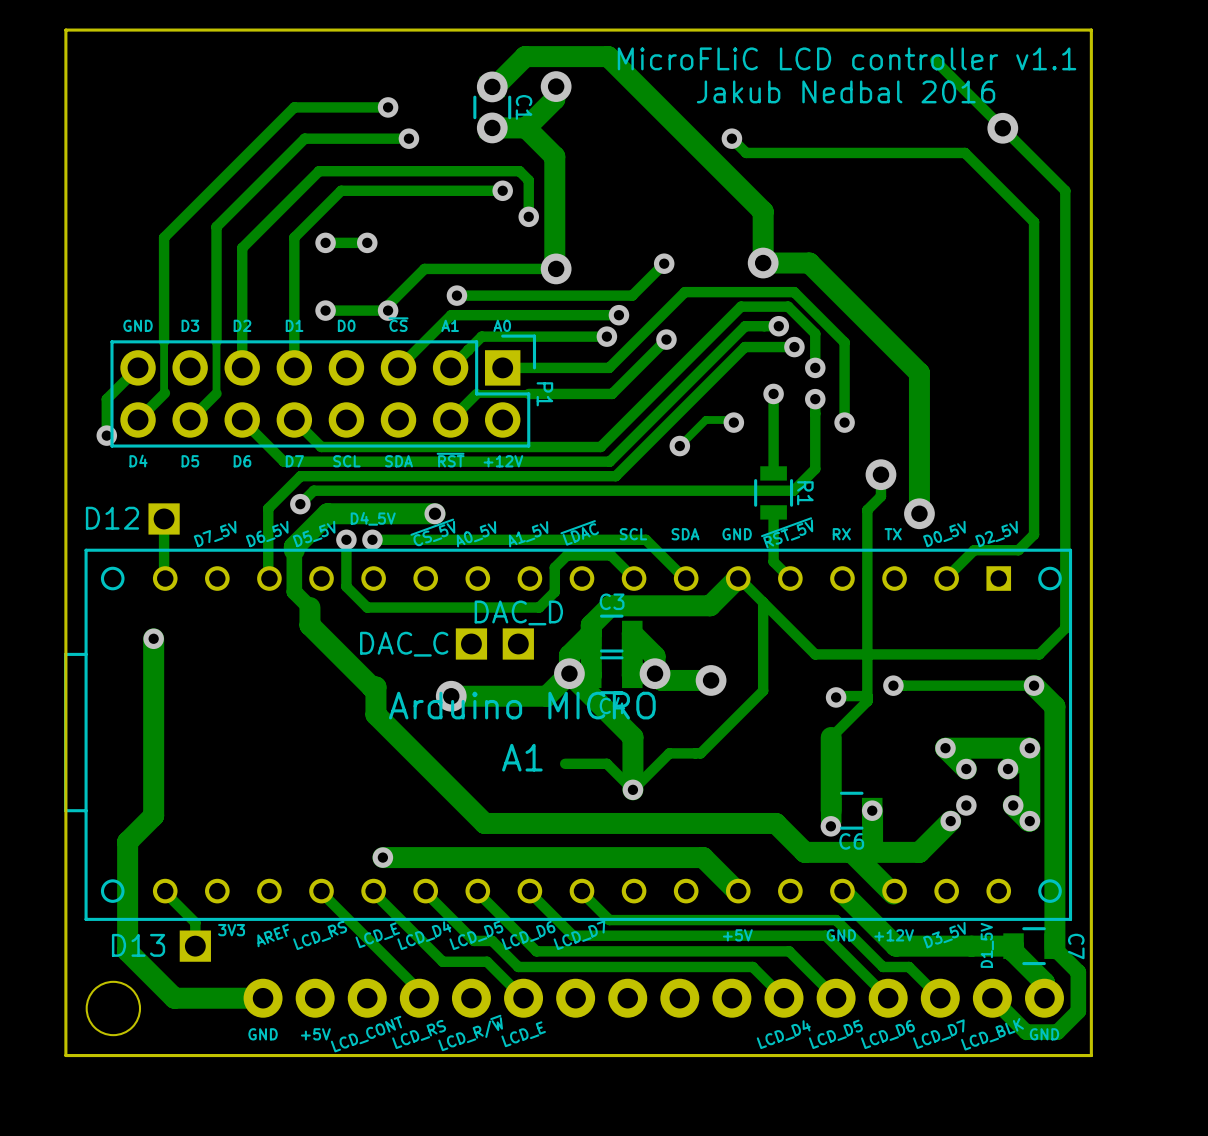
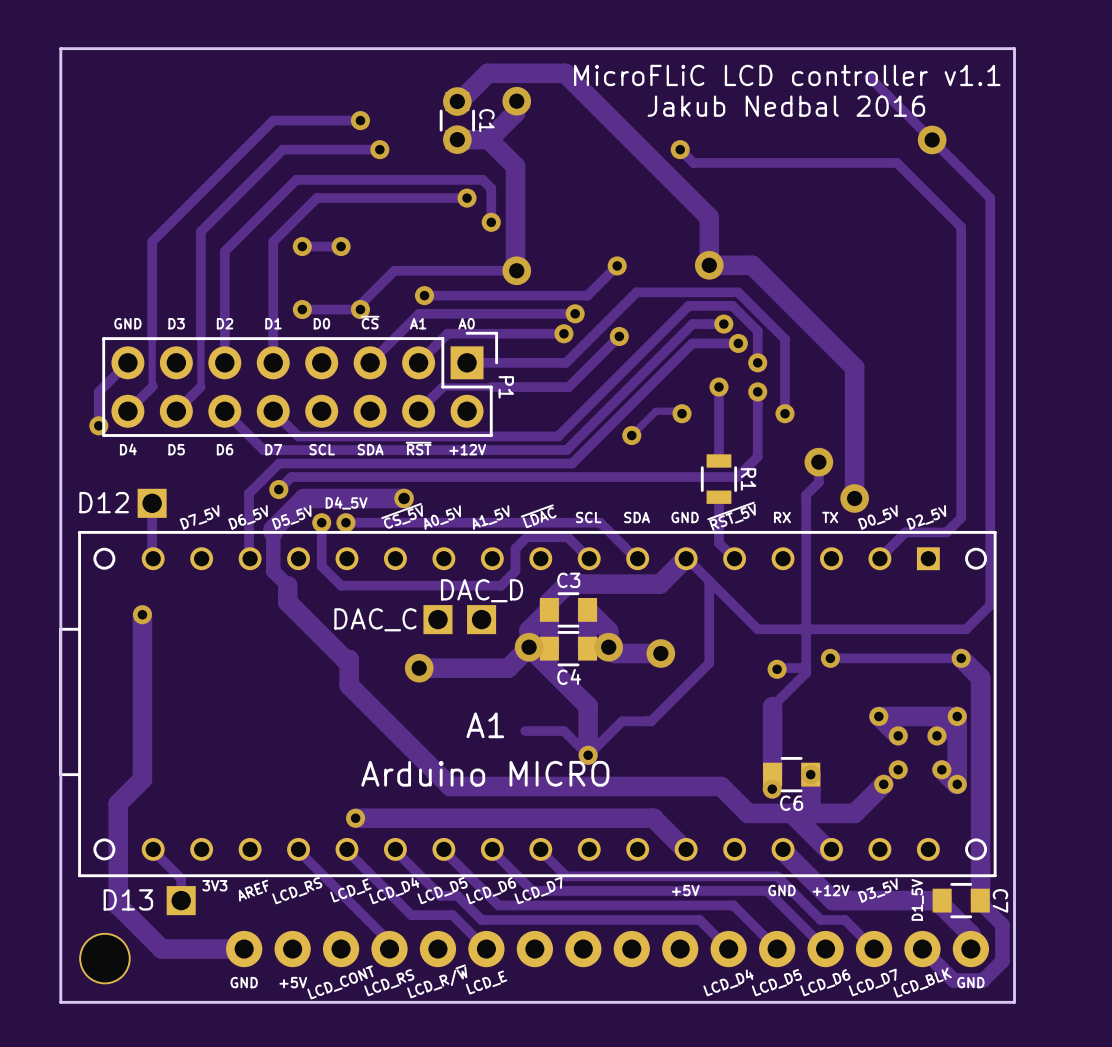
A1 value position: Arduino MICRO (522, 705) -> Arduino MICRO (485, 773)

